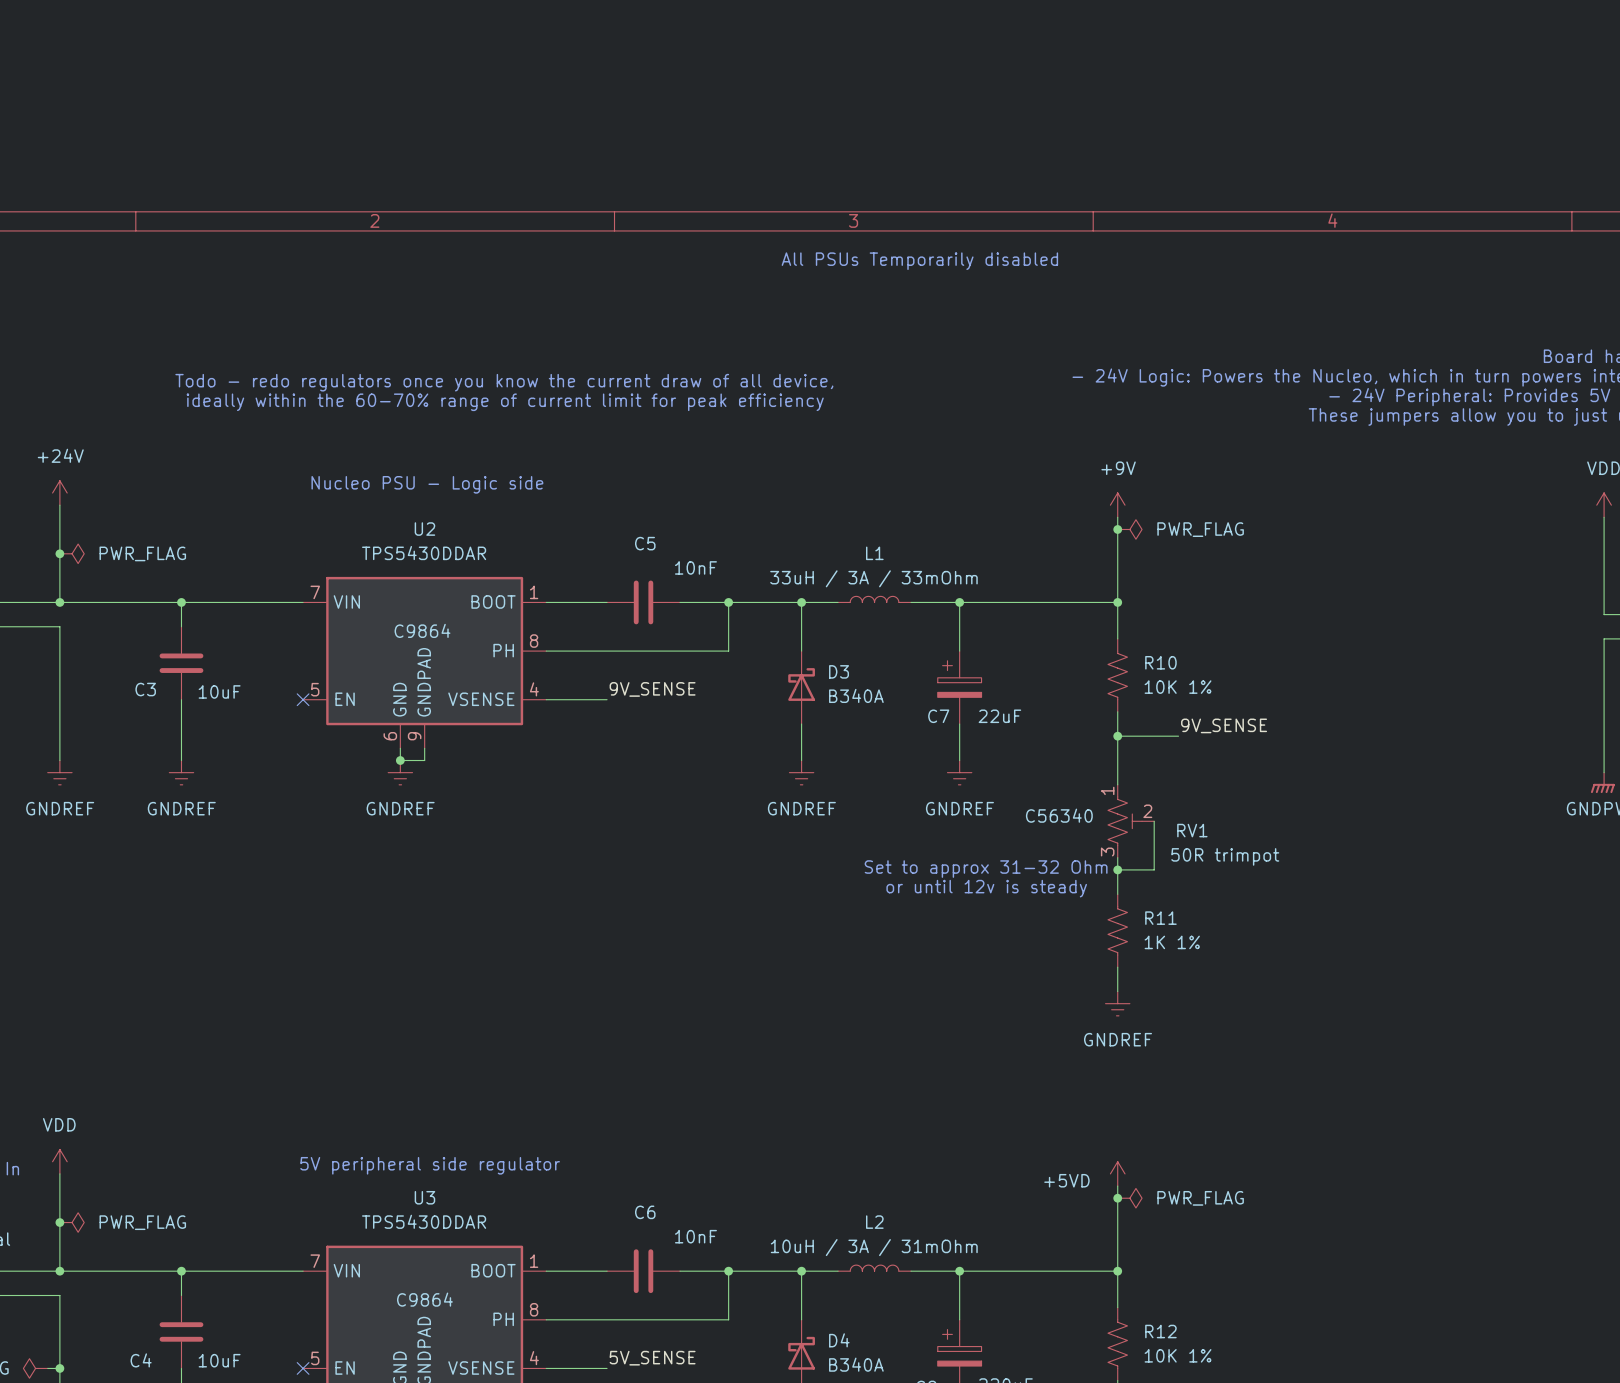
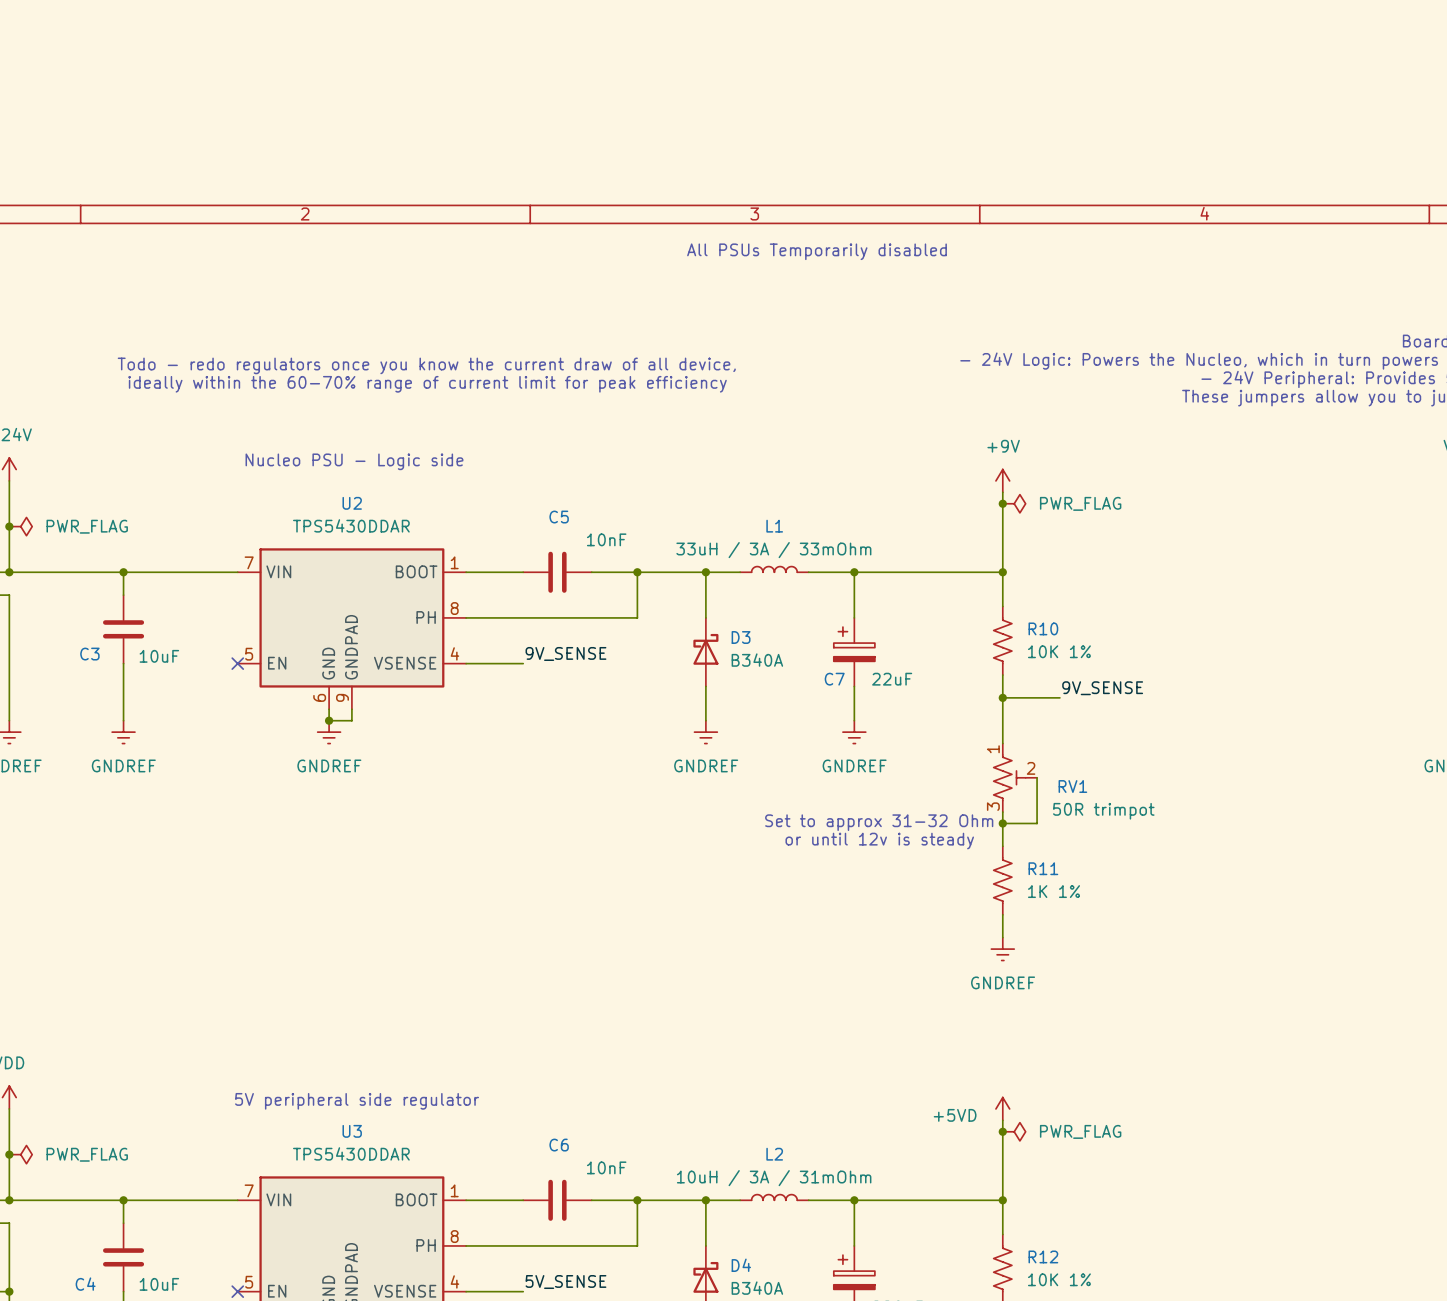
U2 text: C9864 (422, 630) -> none
RV1 text: C56340 (1059, 815) -> none
U3 text: C9864 (424, 1299) -> none

